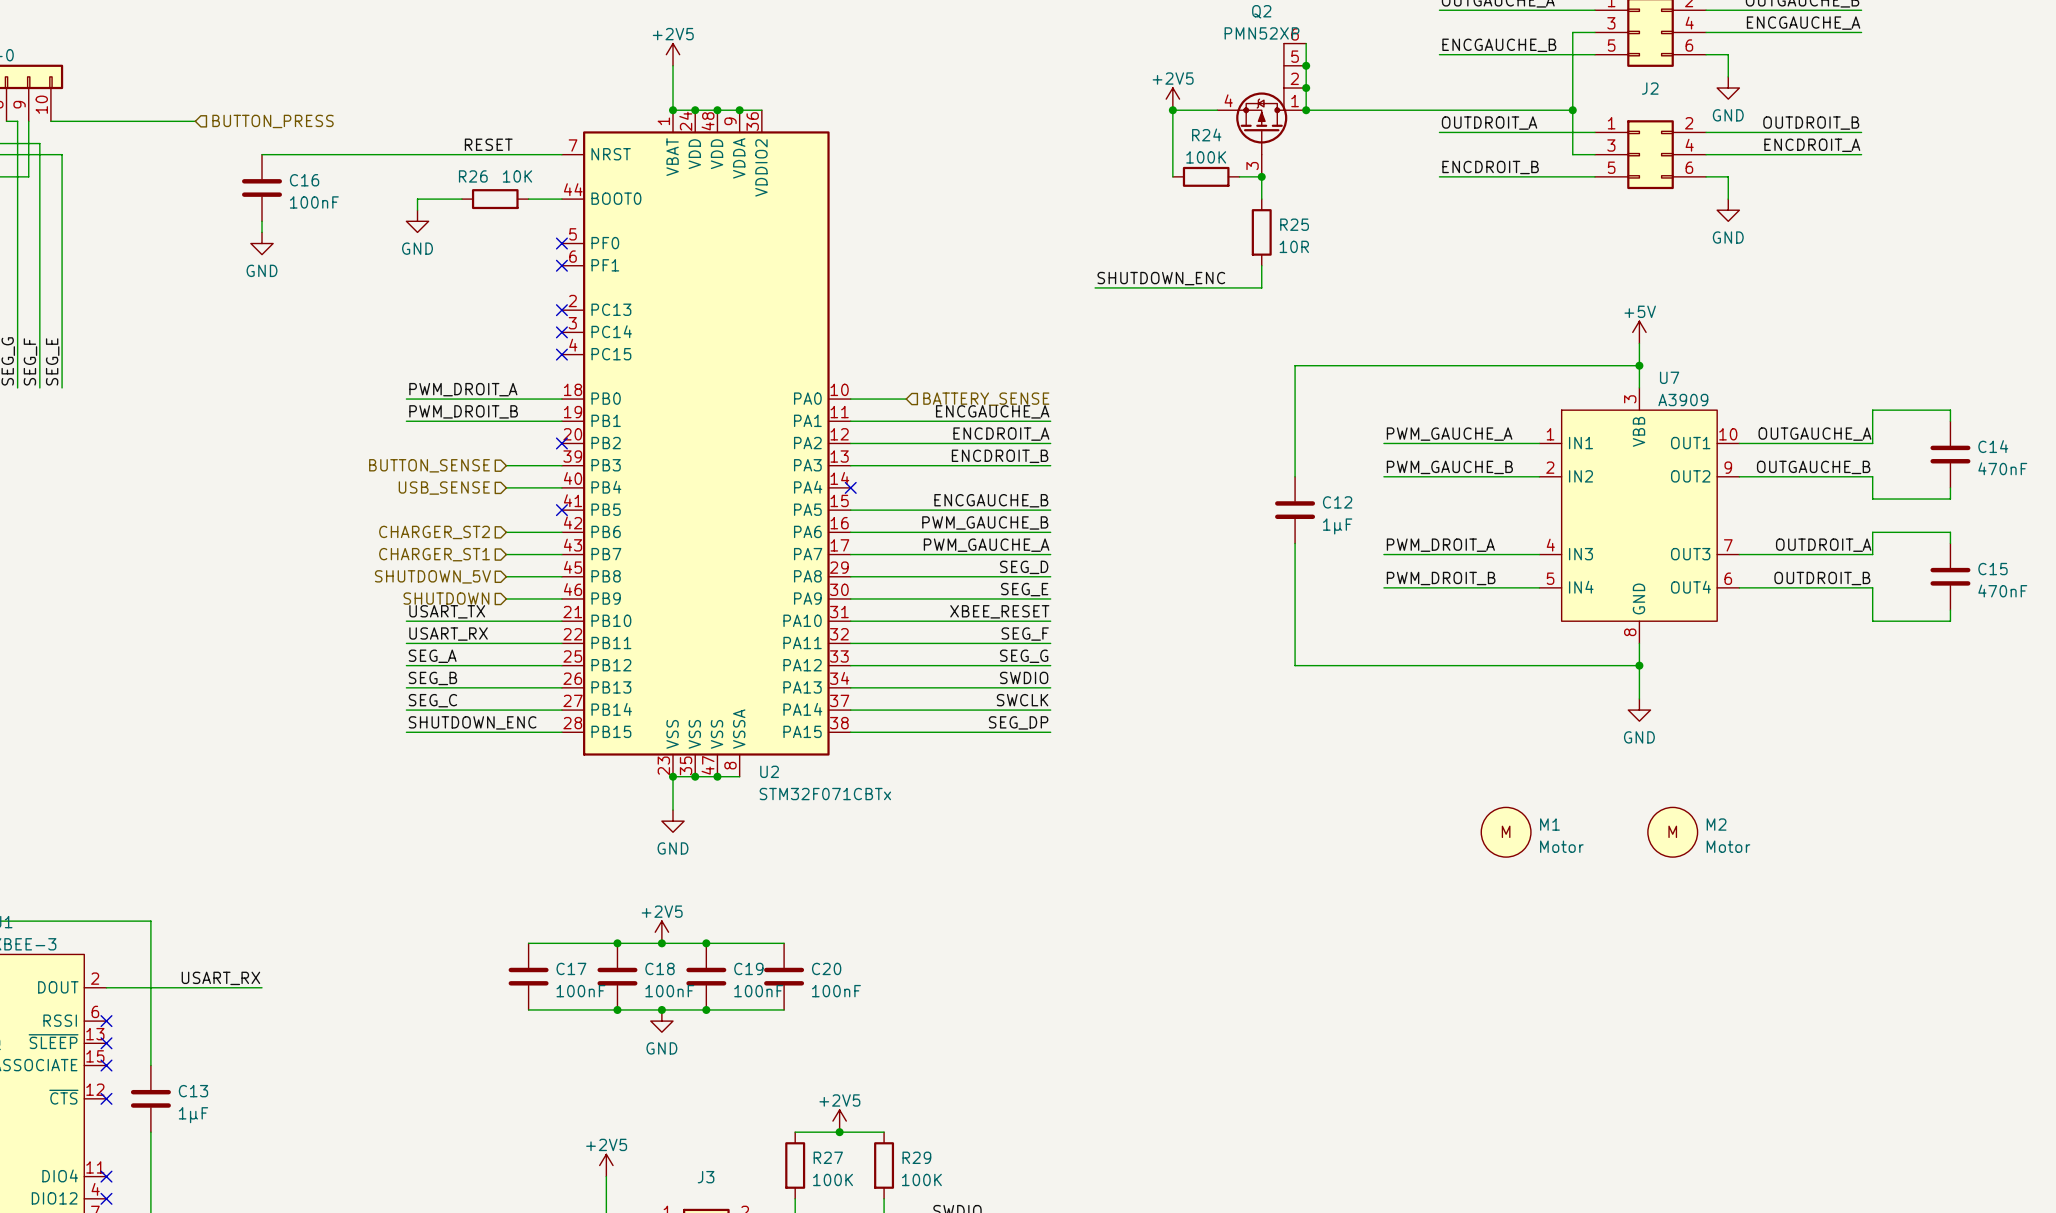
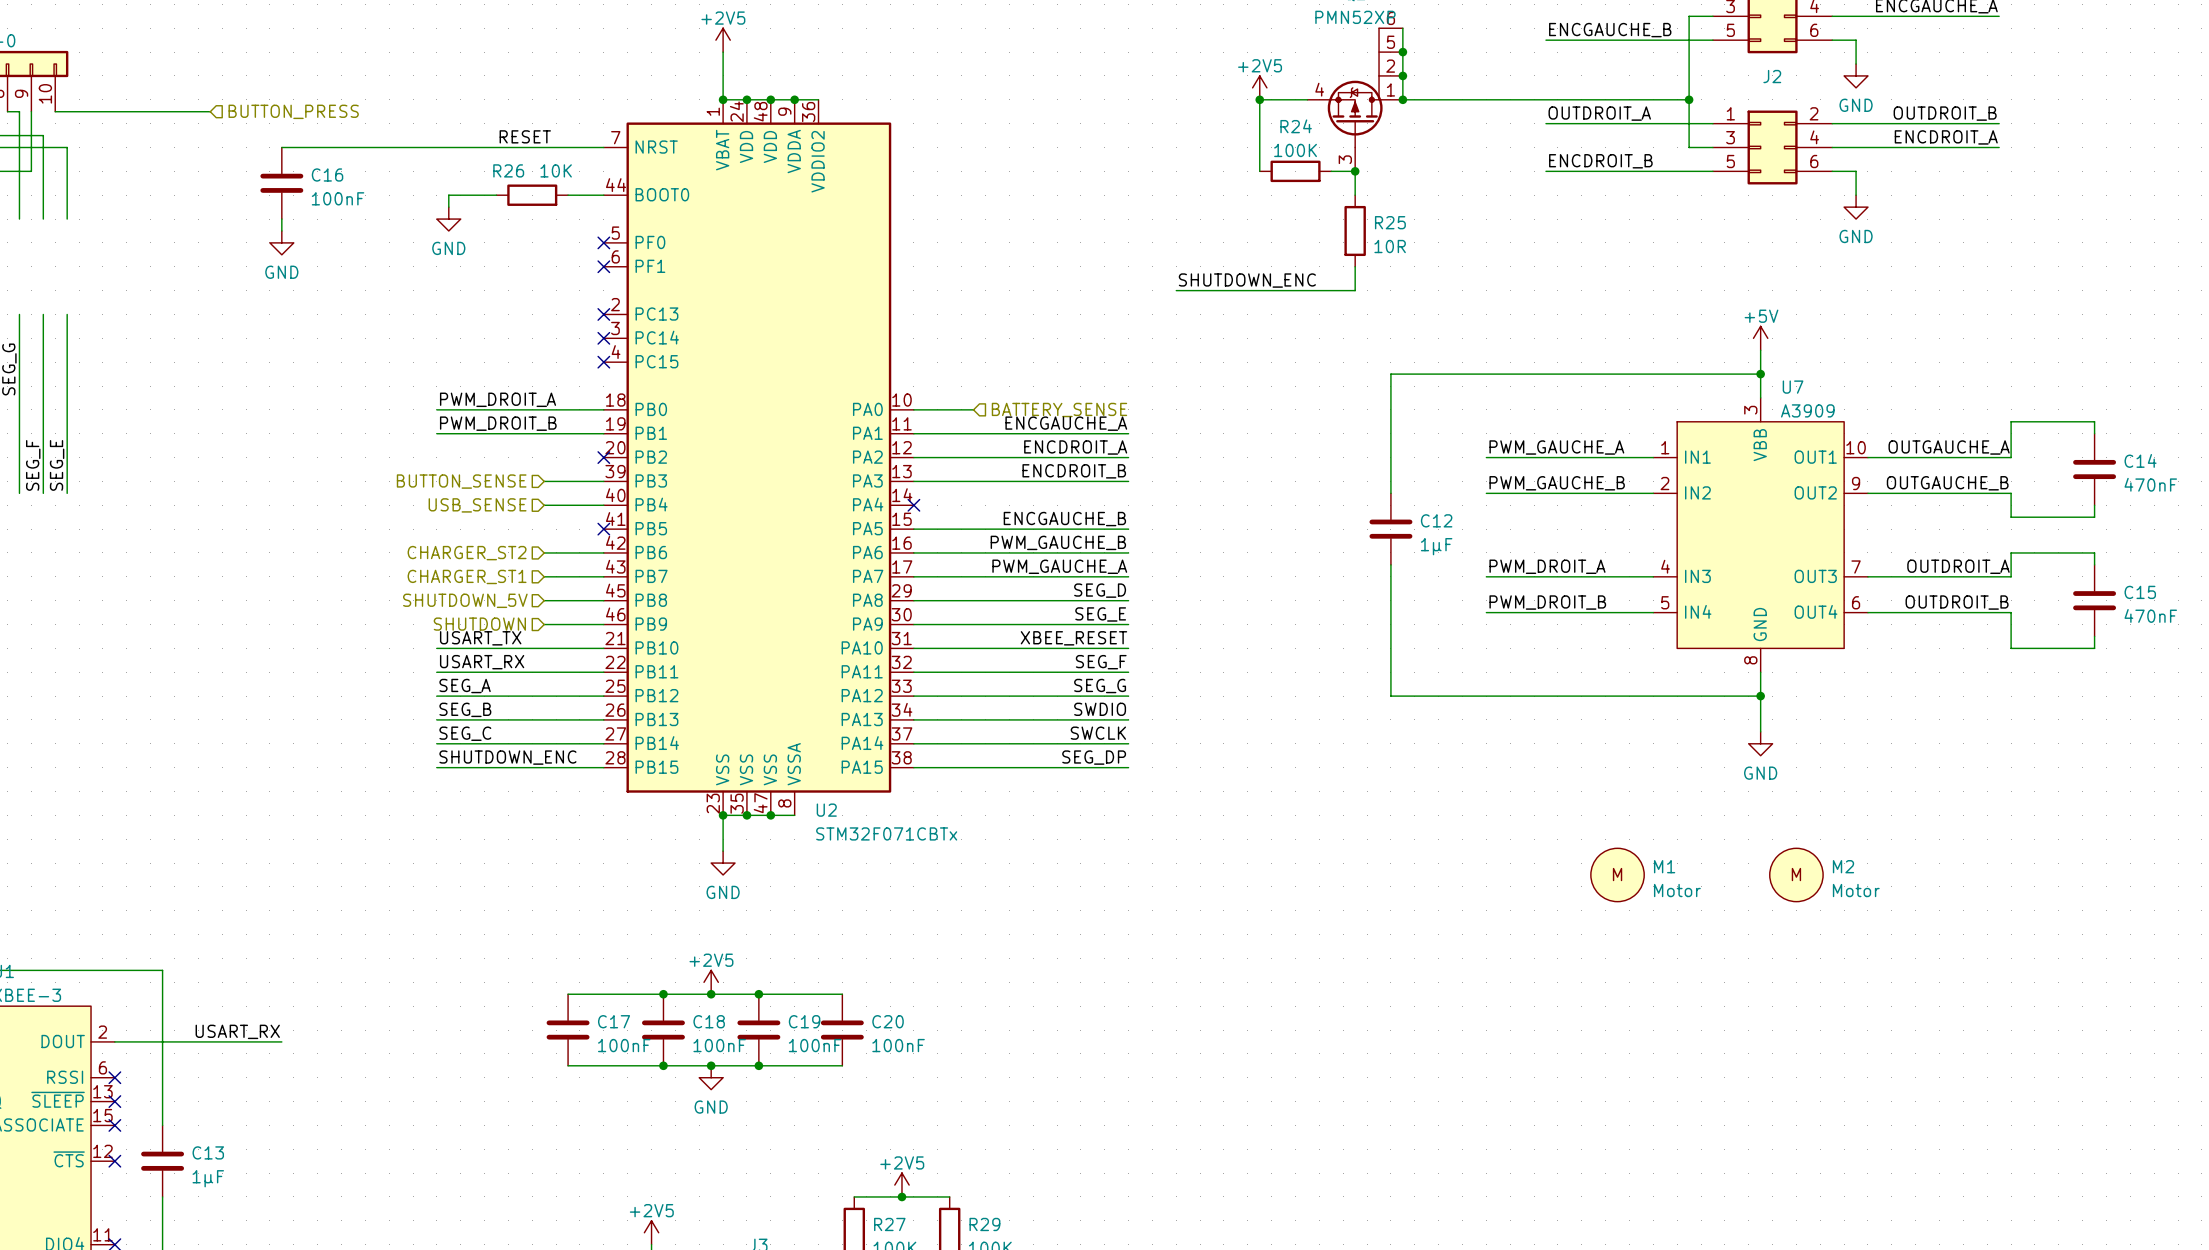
wire: (17, 221) (17, 310) -> (19, 397) (19, 493)
wire: (39, 221) (39, 310) -> (43, 397) (43, 493)
wire: (62, 221) (62, 310) -> (67, 397) (67, 493)
label position: SEG_F (30, 361) -> SEG_F (33, 465)
label position: SEG_E (52, 361) -> SEG_E (57, 465)

